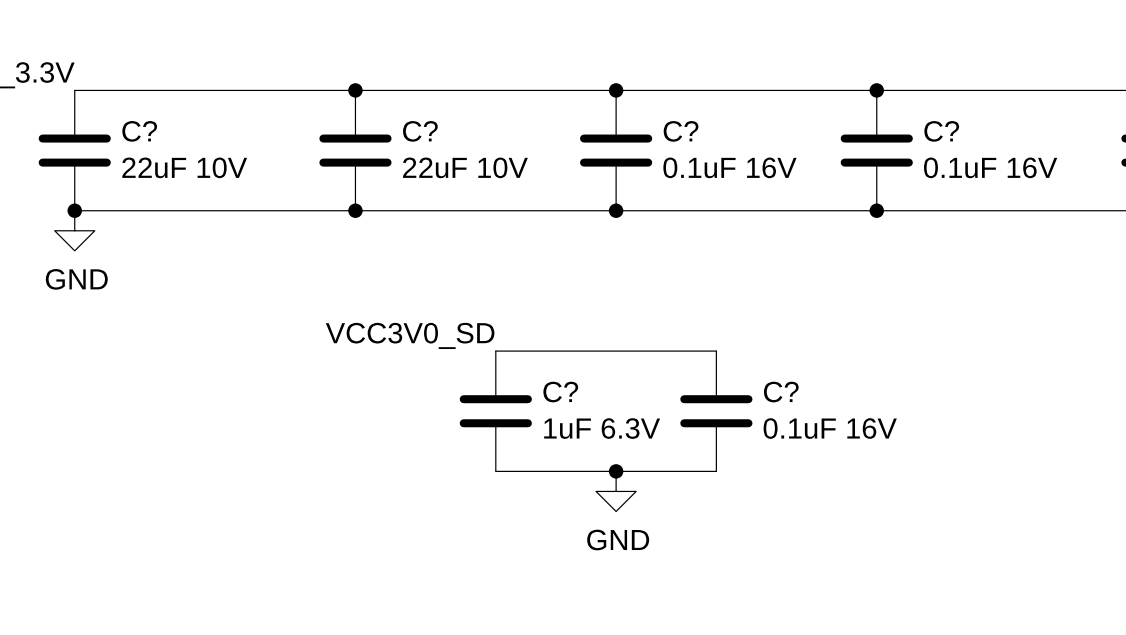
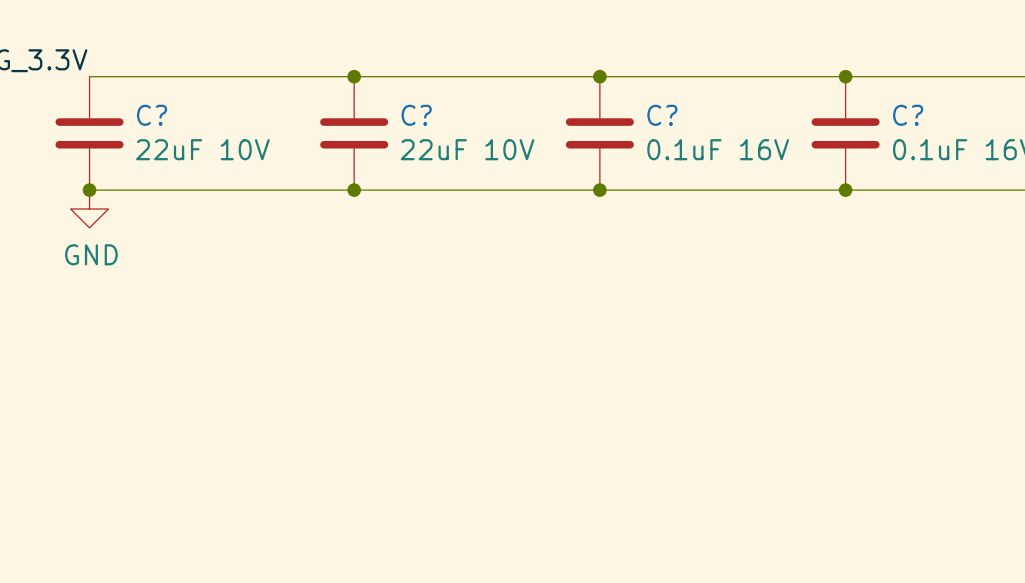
label: VCC3V0_SD (410, 335) -> none
wire: (495, 351) (716, 351) -> none
C?: 1uF 6.3V (495, 411) -> none
C?: 0.1uF 16V (716, 411) -> none
wire: (495, 471) (716, 471) -> none
junction: (616, 471) -> none
power symbol: GND (616, 491) -> none

